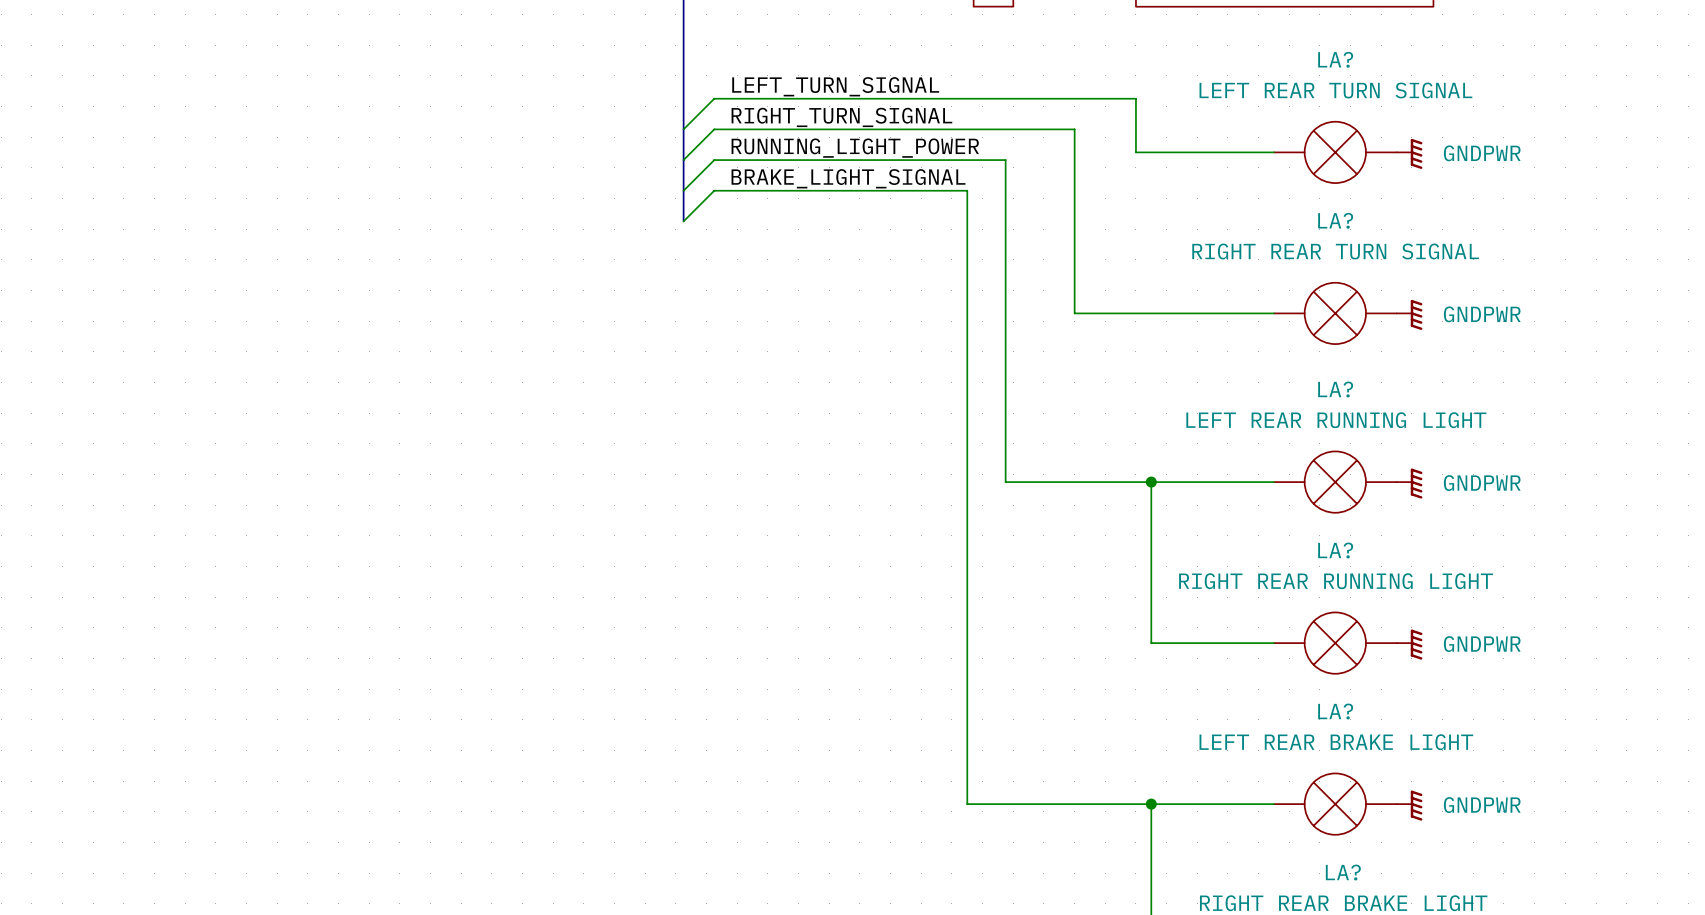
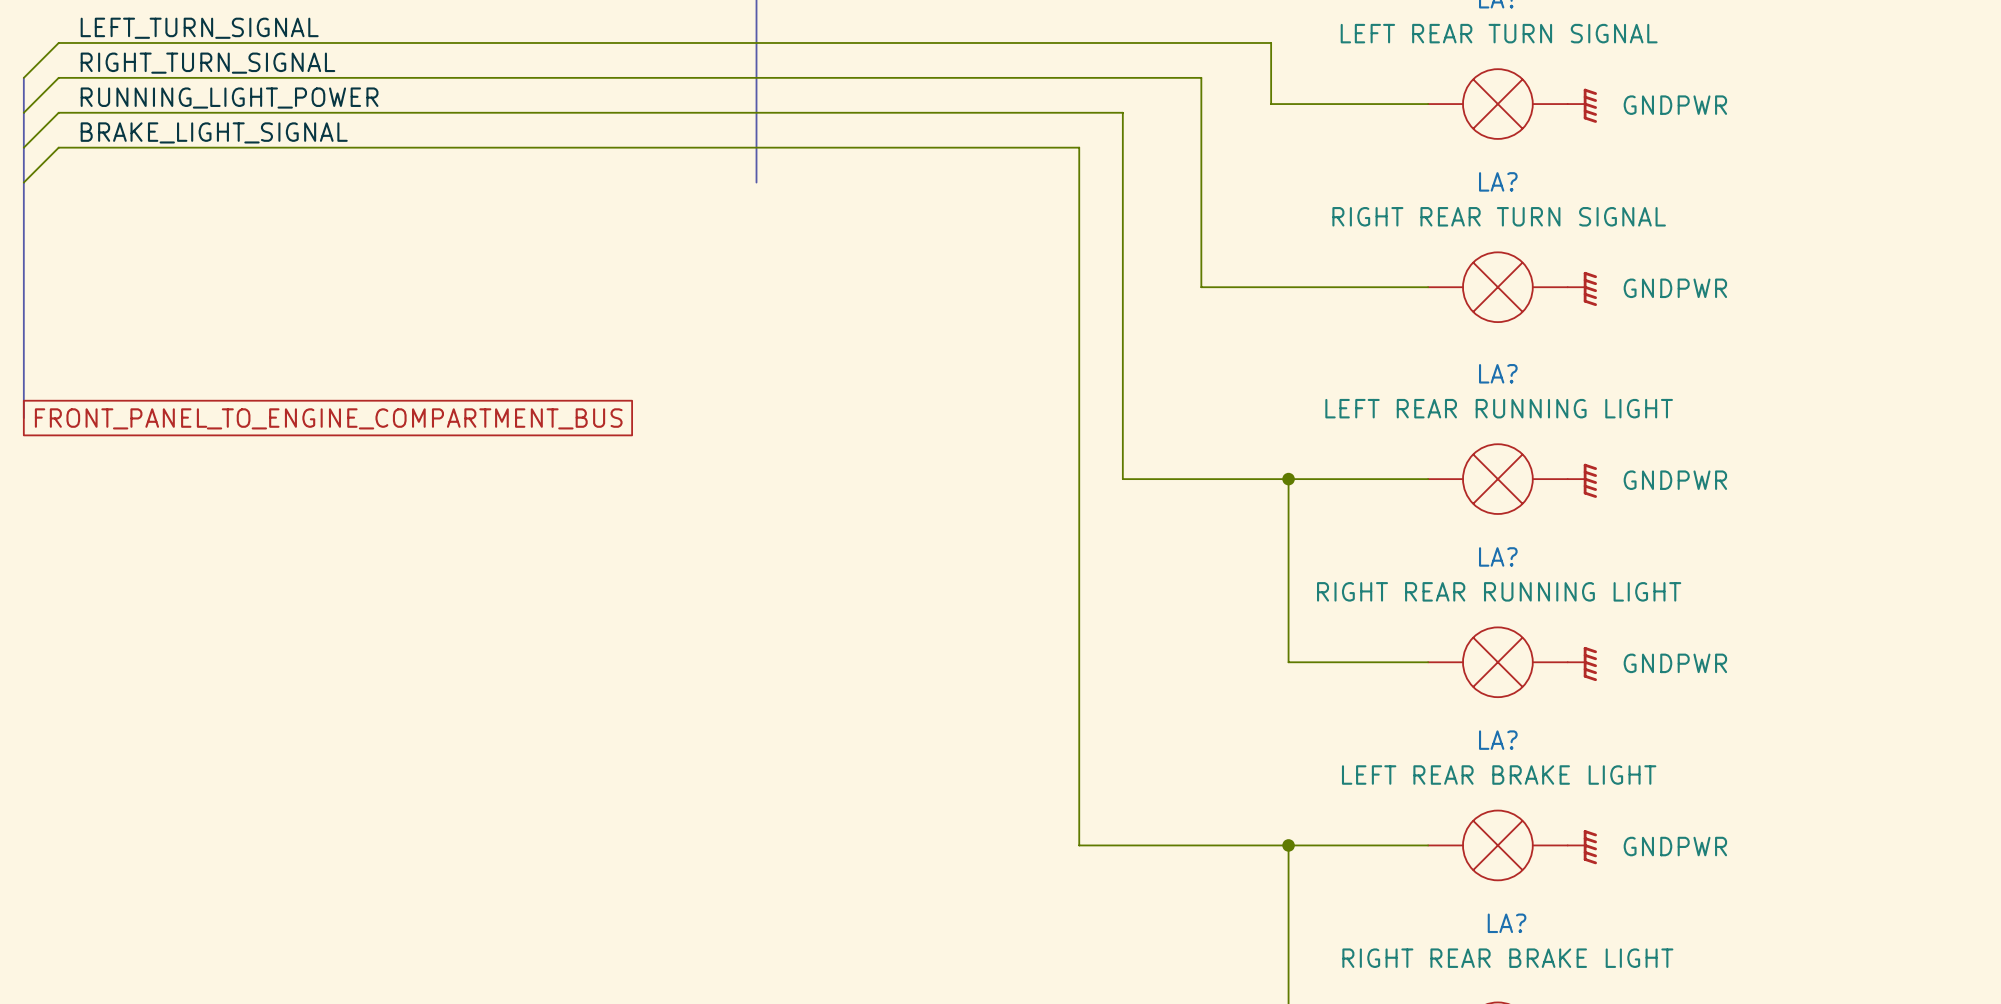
label: none -> LEFT_TURN_SIGNAL (199, 28)
label: LEFT_TURN_SIGNAL (835, 86) -> none
wire: (714, 98) (683, 129) -> (791, 42) (58, 42) (23, 77)
label: none -> RIGHT_TURN_SIGNAL (207, 63)
label: RIGHT_TURN_SIGNAL (841, 117) -> none
bus: none -> (23, 77) (23, 418)
wire: (714, 129) (683, 160) -> (791, 77) (58, 77) (23, 112)
label: none -> RUNNING_LIGHT_POWER (229, 98)
label: RUNNING_LIGHT_POWER (855, 148) -> none
wire: (714, 160) (683, 190) -> (791, 112) (58, 112) (23, 147)
label: none -> BRAKE_LIGHT_SIGNAL (214, 132)
label: BRAKE_LIGHT_SIGNAL (848, 178) -> none
wire: (714, 190) (683, 221) -> (791, 147) (58, 147) (23, 182)
global label: none -> FRONT_PANEL_TO_ENGINE_COMPARTMENT_BUS (328, 418)

